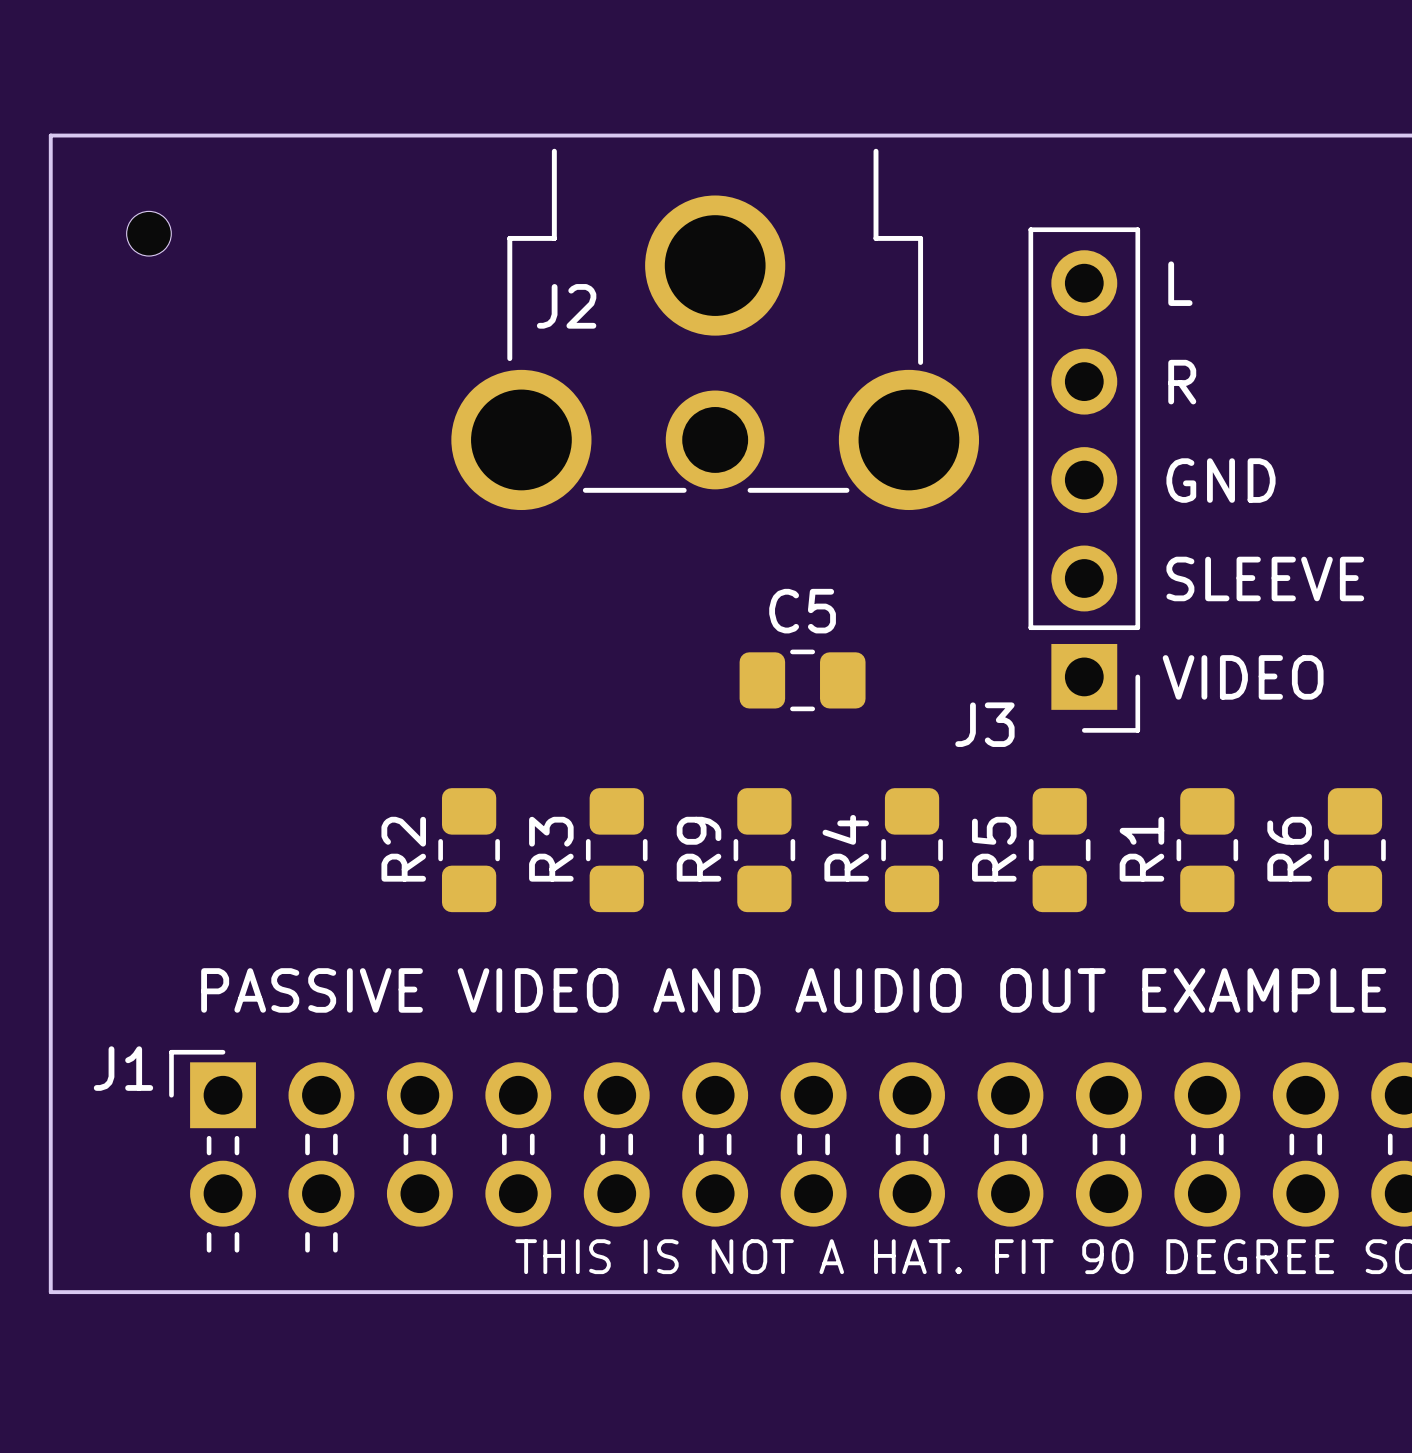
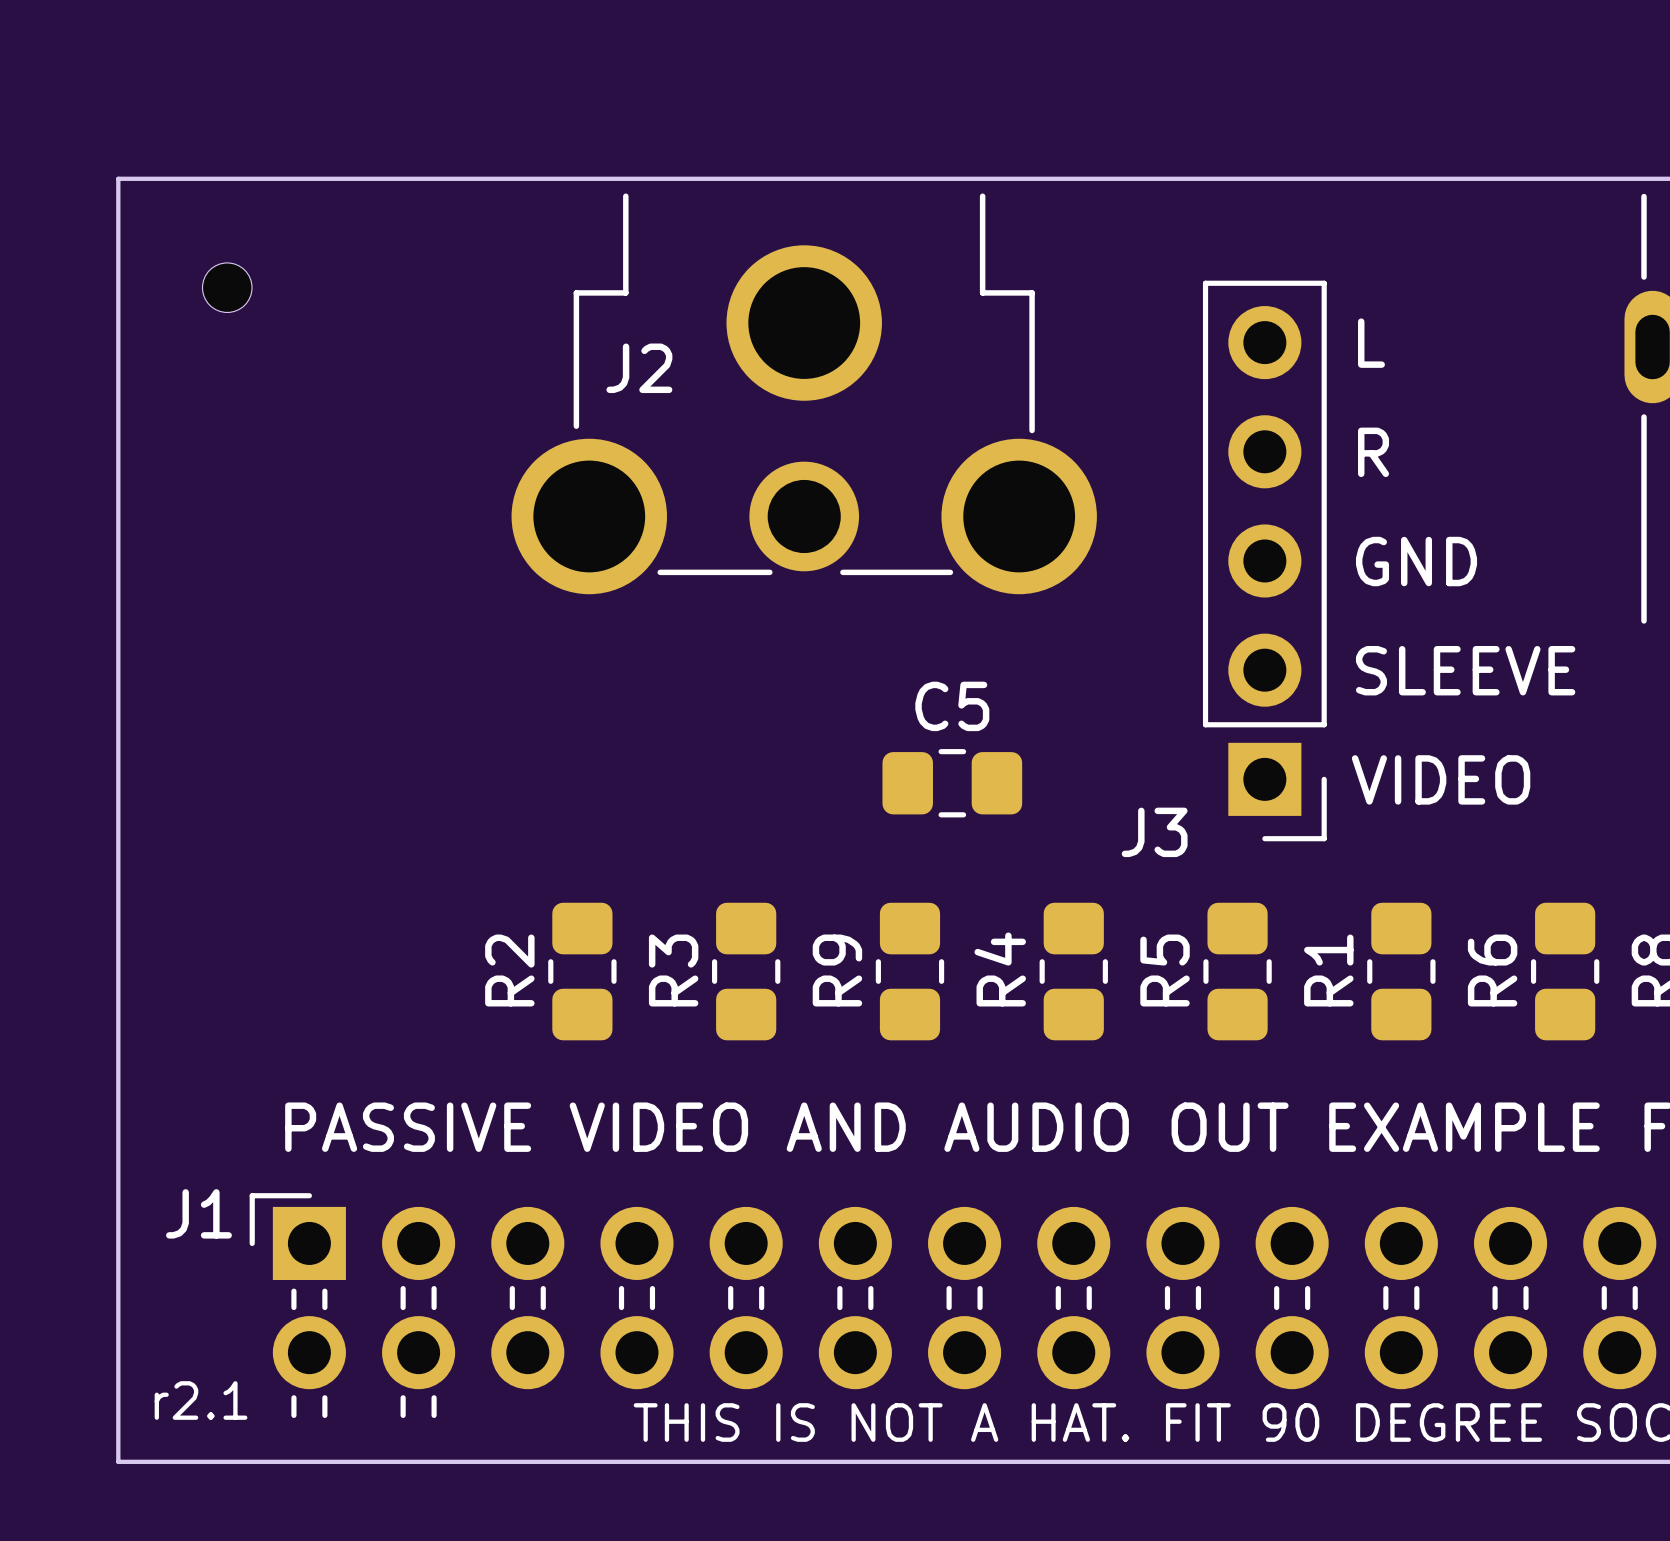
J2 position: (715, 329) -> (804, 393)
text: none -> r2.1 (201, 1400)

